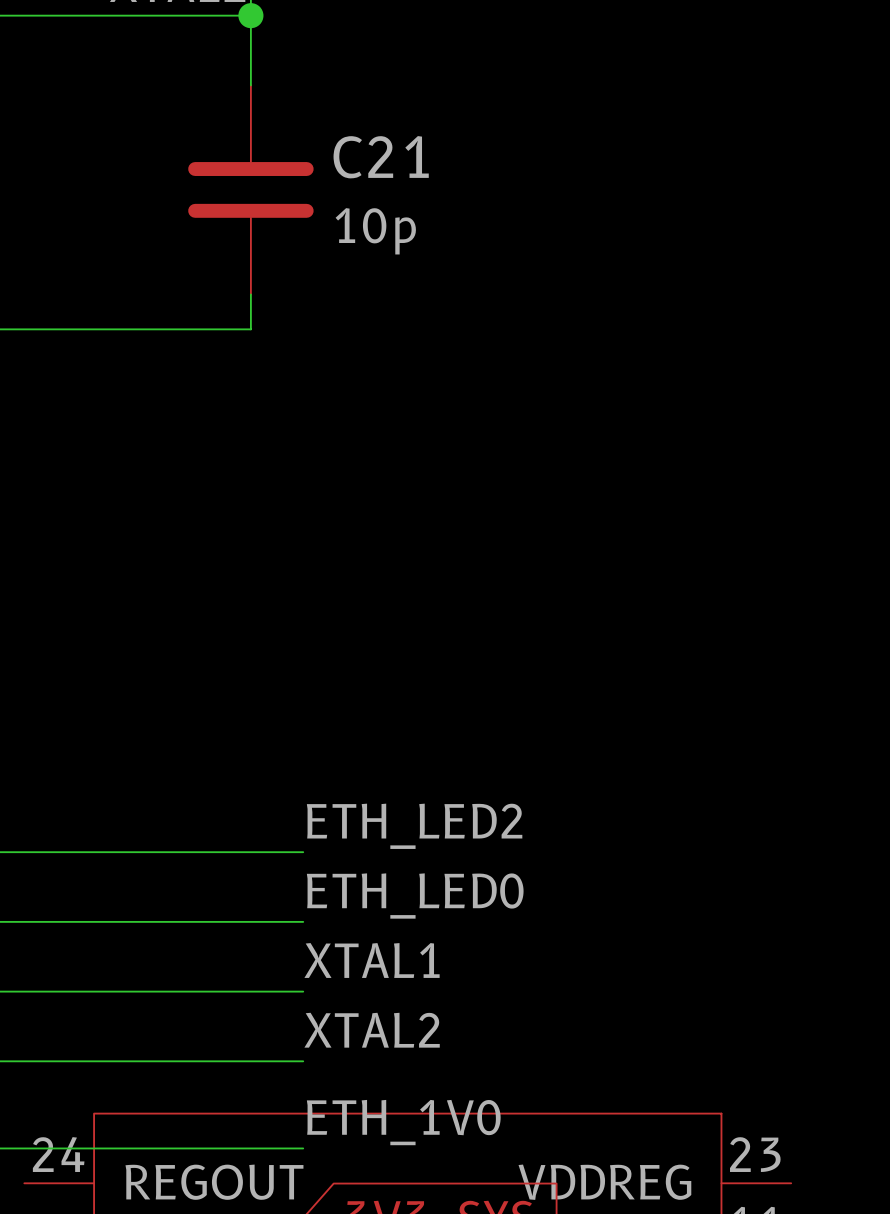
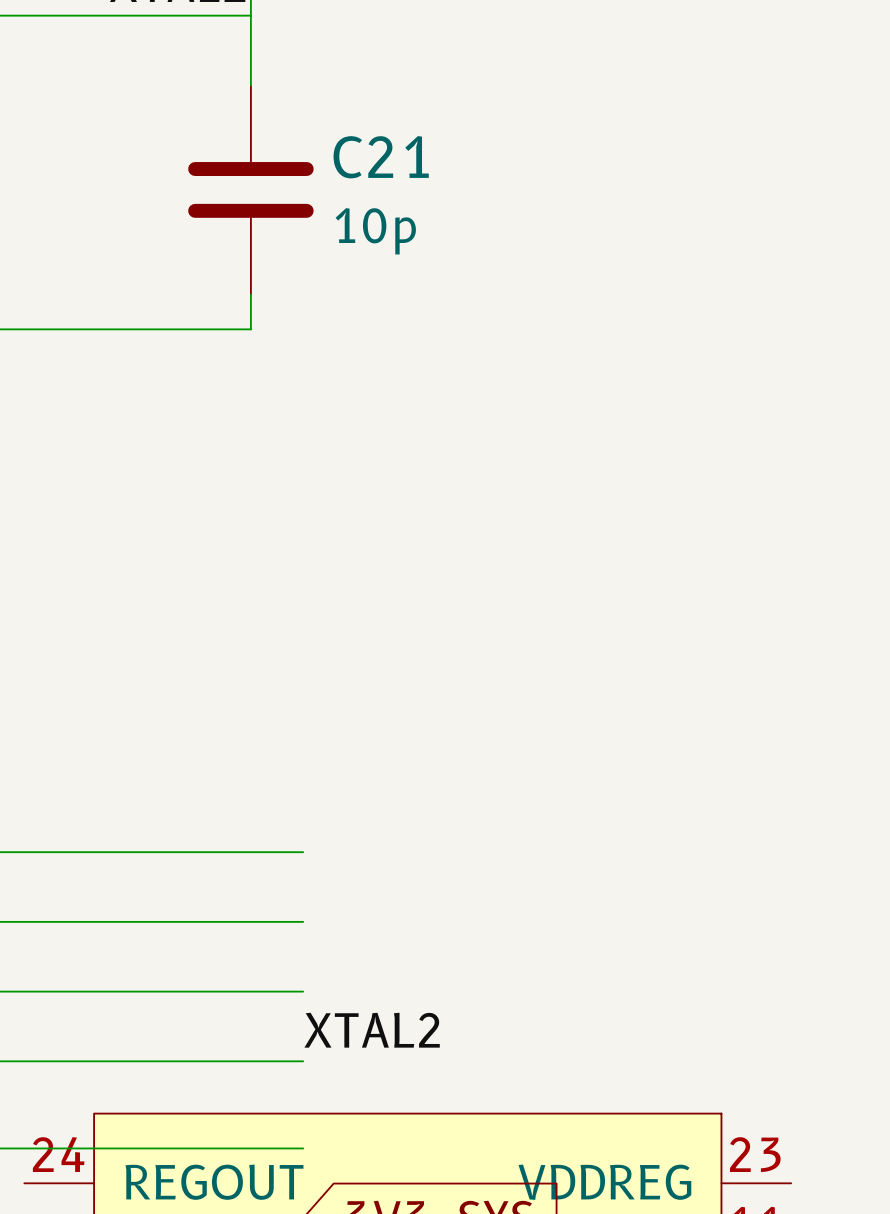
junction: (250, 15) -> none
label: ETH_LED2 (414, 826) -> none
label: ETH_LED0 (415, 896) -> none
label: XTAL1 (372, 960) -> none
label: ETH_1V0 (403, 1122) -> none

